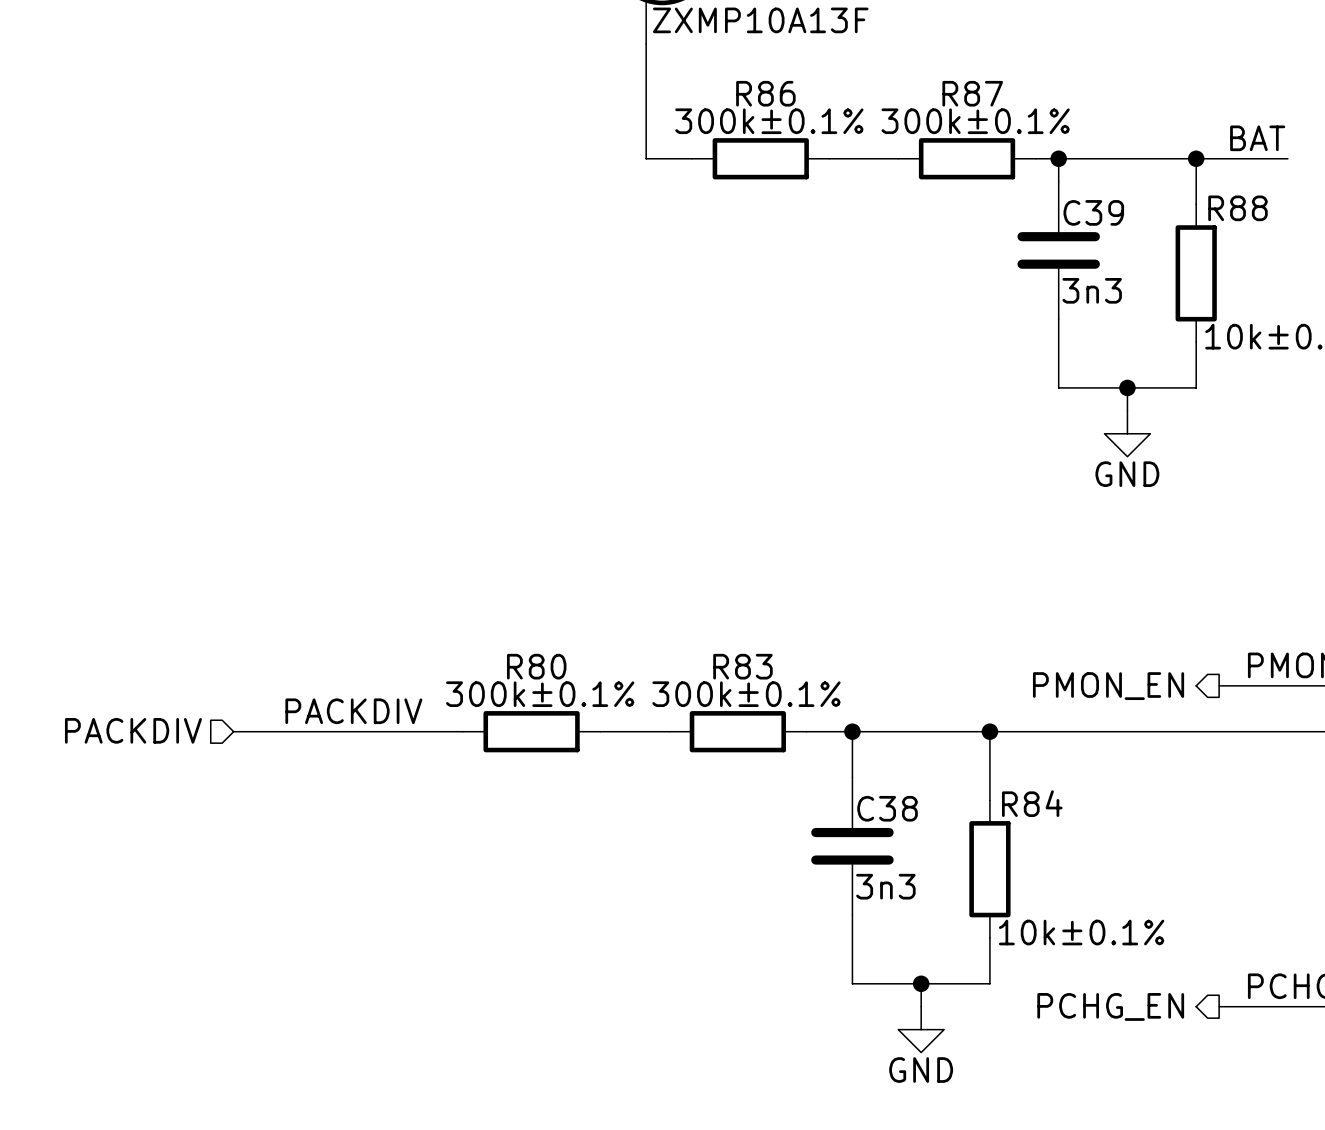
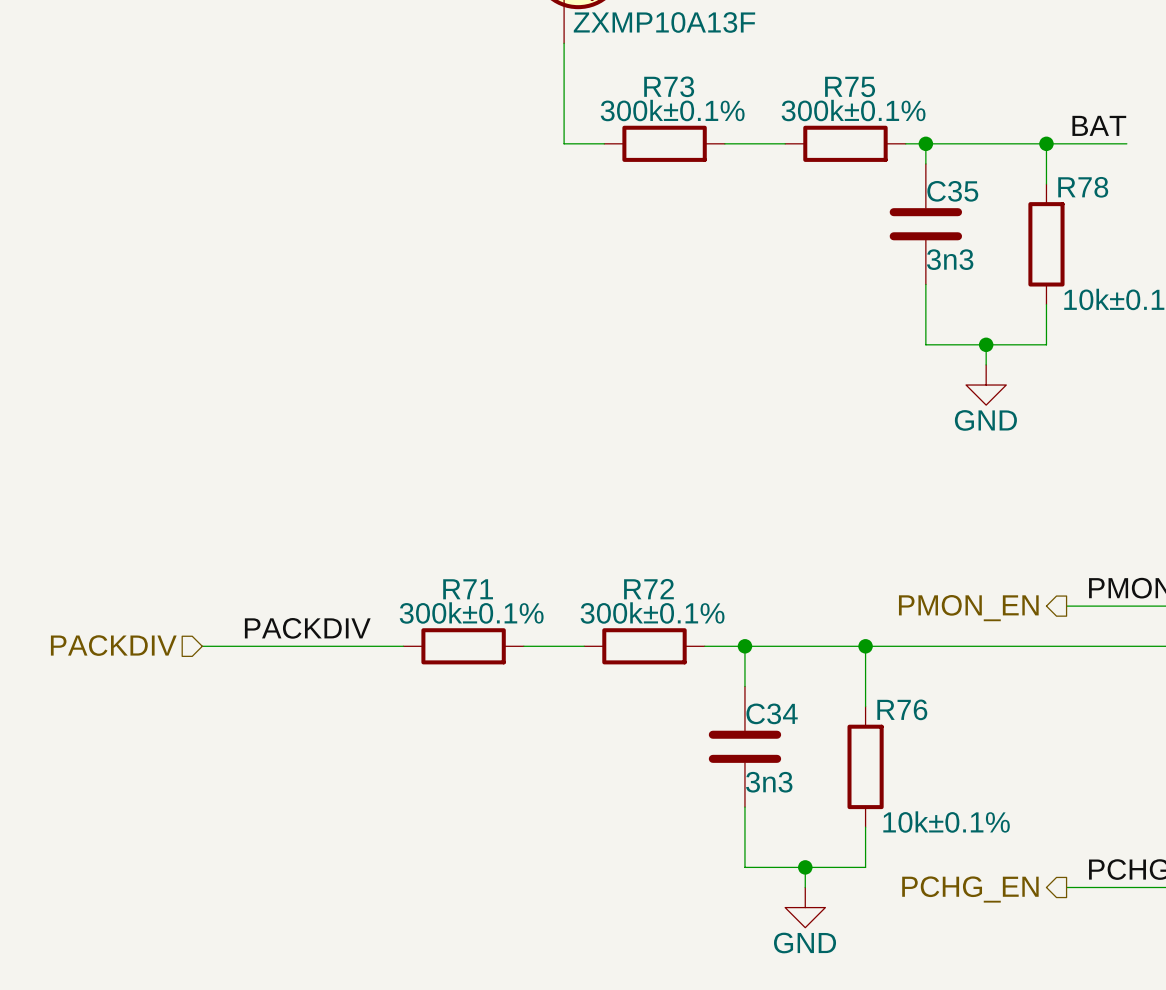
R86 name: R86 (765, 93) -> R73 (669, 86)
R87 name: R87 (972, 93) -> R75 (850, 86)
R88 name: R88 (1237, 208) -> R78 (1083, 187)
C39 name: C39 (1093, 212) -> C35 (952, 191)
R80 name: R80 (536, 666) -> R71 (468, 589)
R83 name: R83 (742, 666) -> R72 (648, 589)
R84 name: R84 (1032, 803) -> R76 (902, 709)
C38 name: C38 (887, 808) -> C34 (772, 713)

